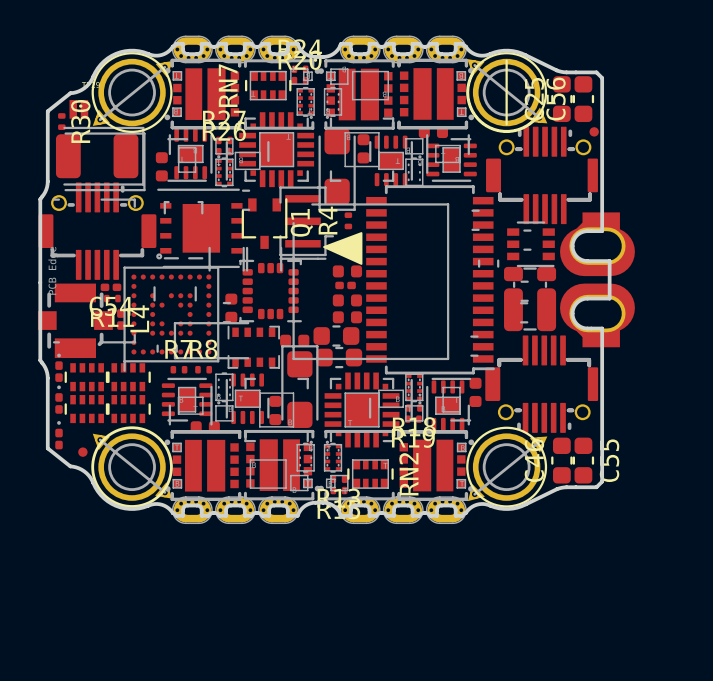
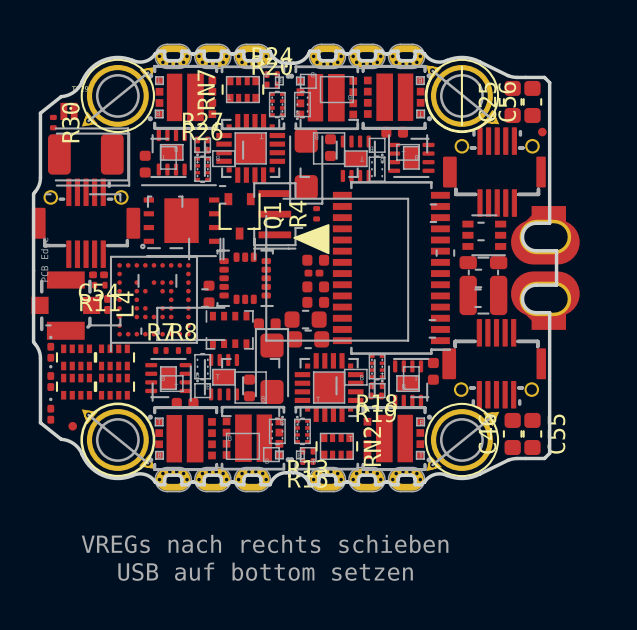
text: none -> VREGs nach rechts schieben (265, 544)
text: none -> USB auf bottom setzen (265, 571)

